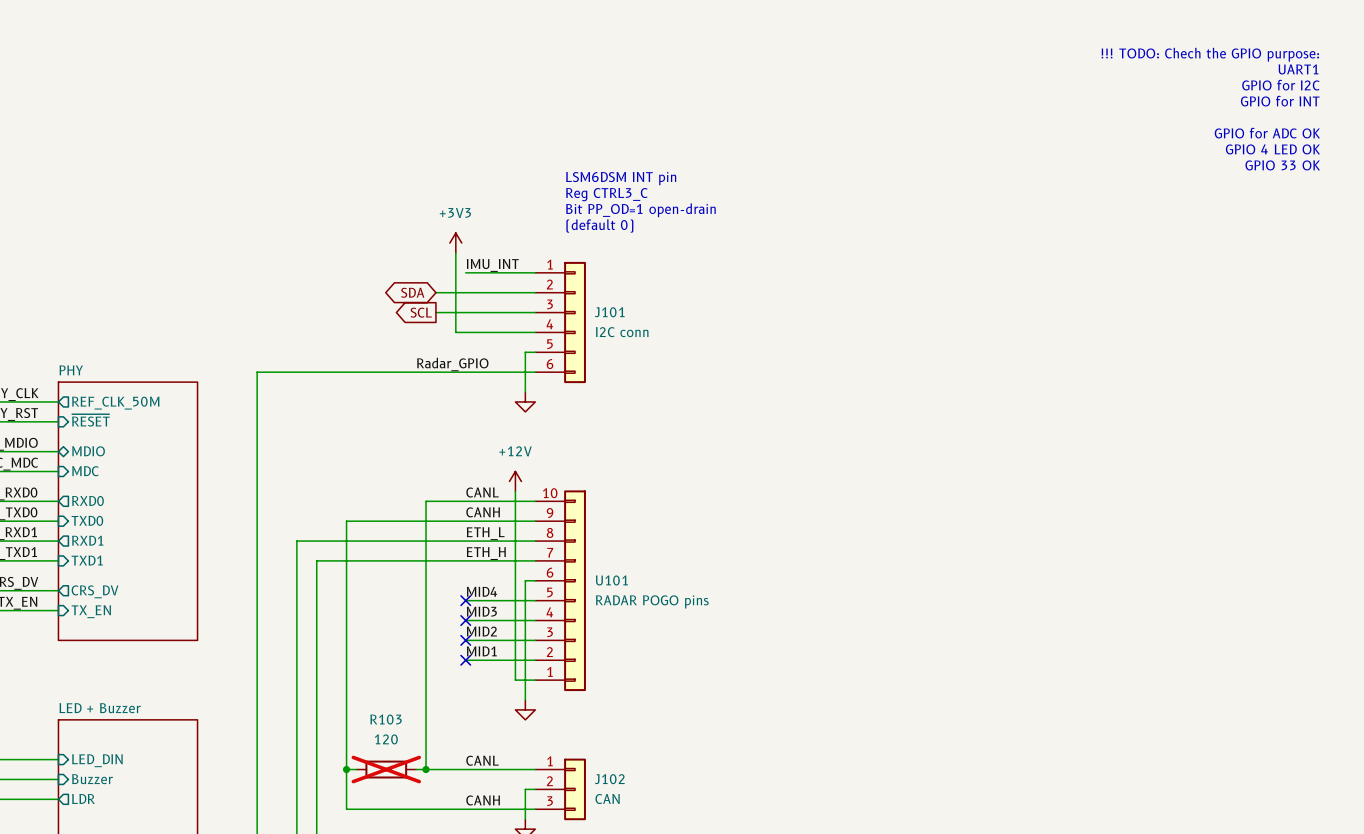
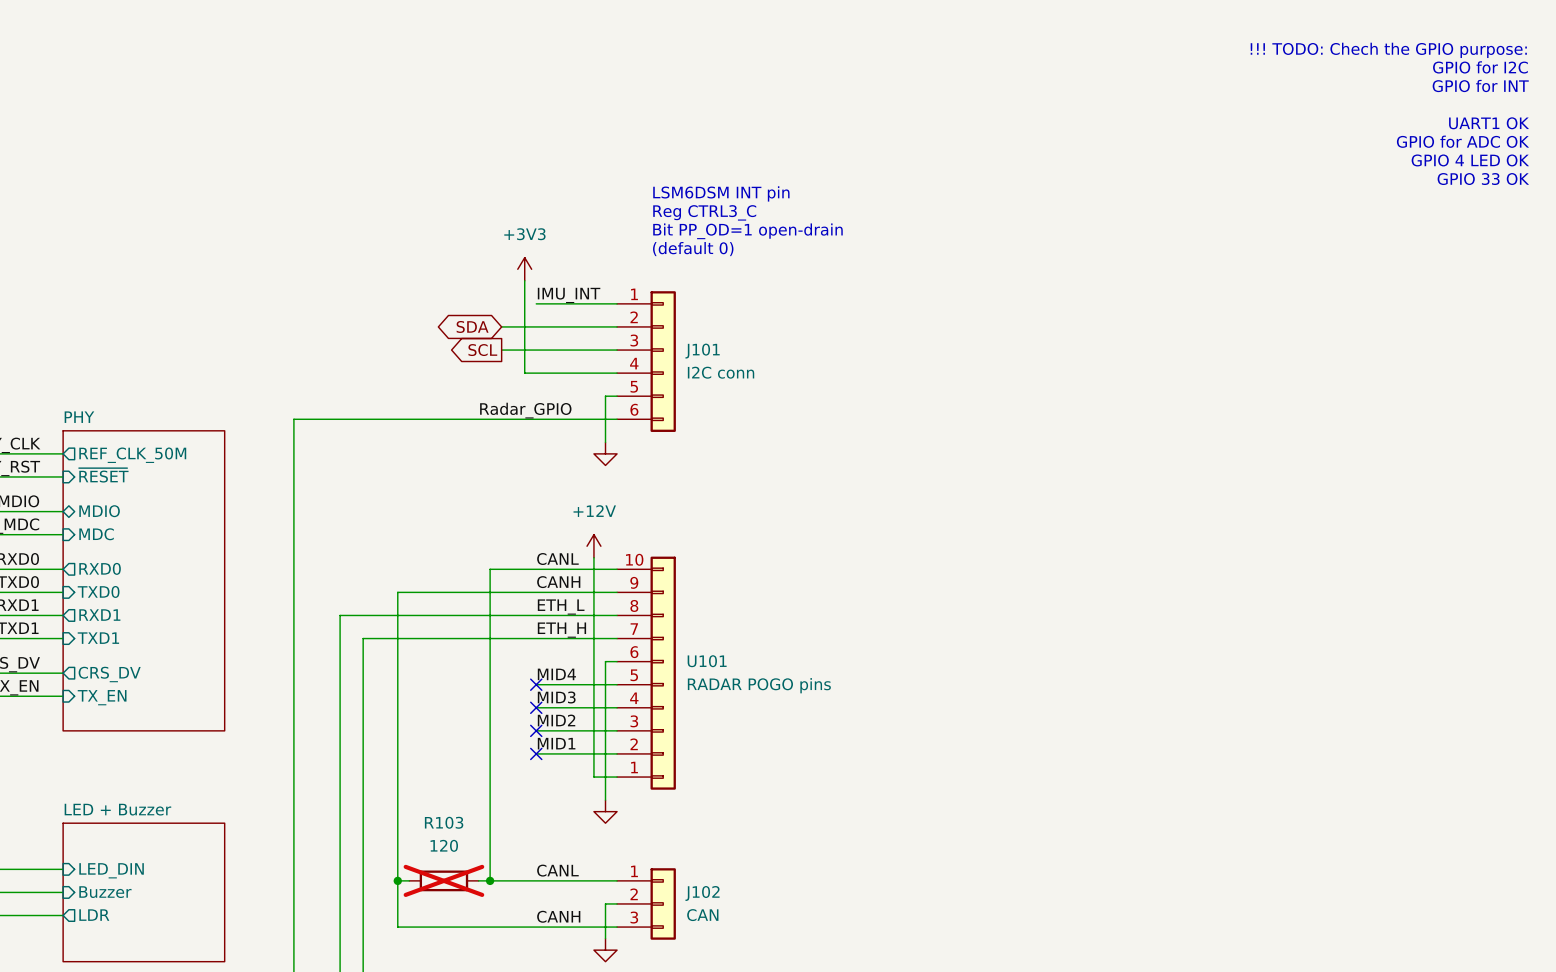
text: UART1 (1298, 69) -> GPIO for I2C (1480, 67)
text: GPIO for I2C (1280, 85) -> GPIO for INT (1480, 85)
text: GPIO for INT (1280, 101) -> none
text: none -> UART1 OK (1489, 123)

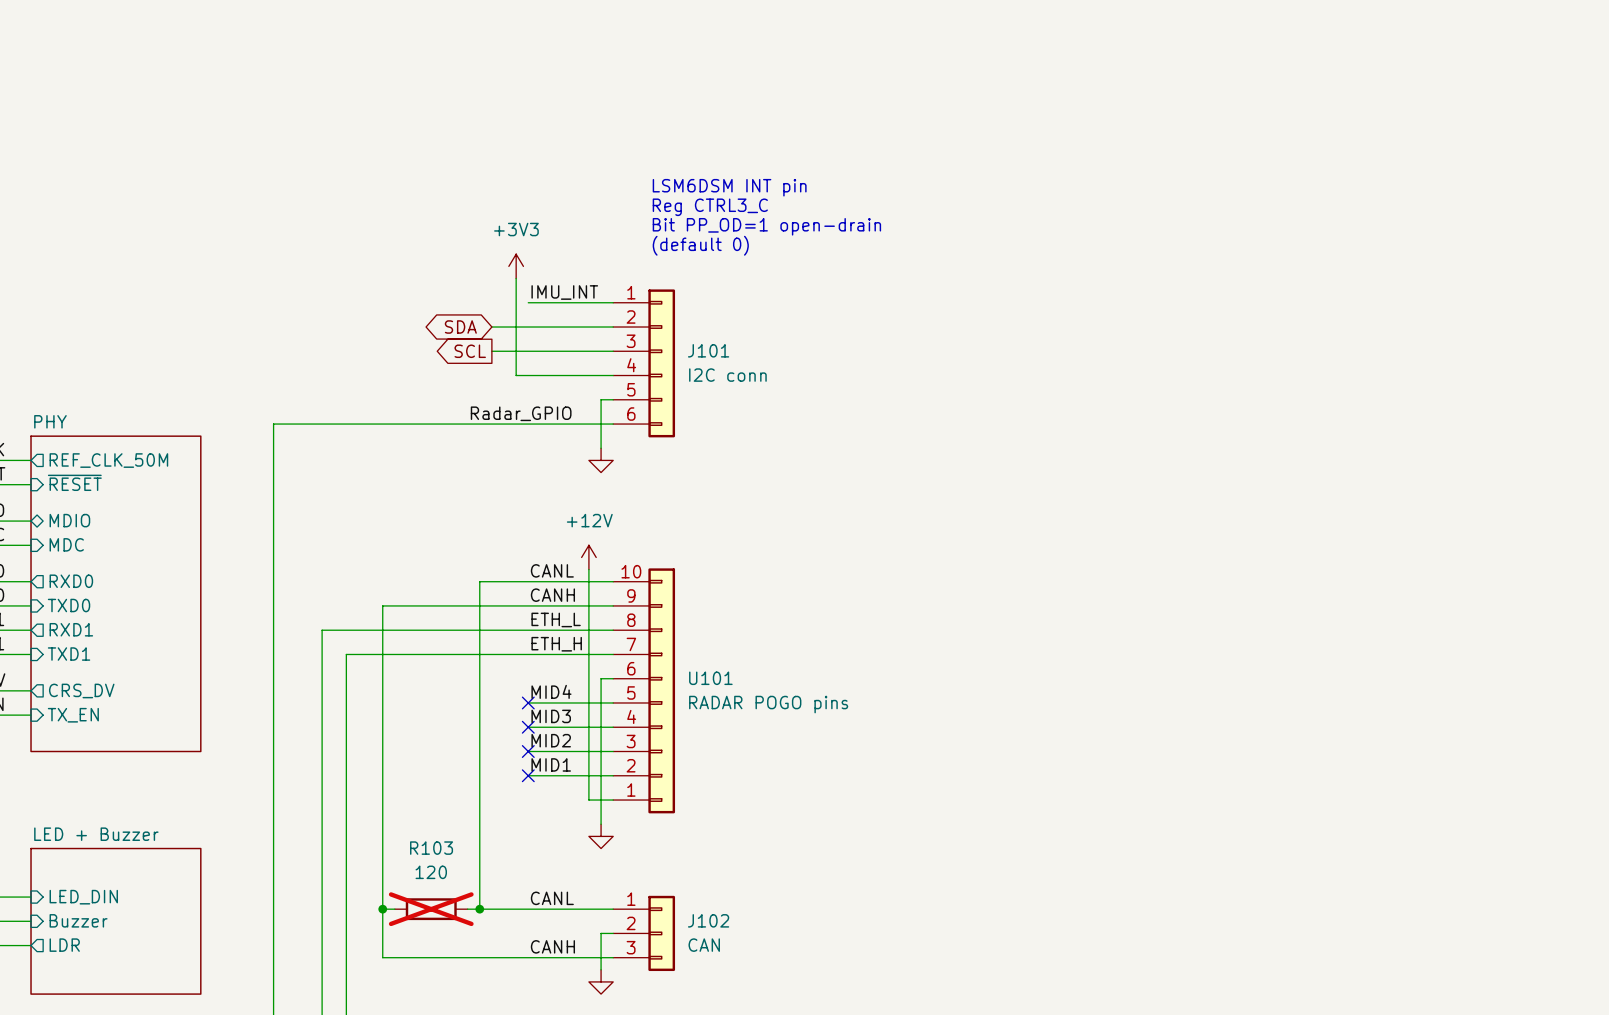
text: !!! TODO: Chech the GPIO purpose: (1388, 50) -> none
text: GPIO for I2C (1480, 67) -> none
text: GPIO for INT (1480, 85) -> none
text: UART1 OK (1489, 123) -> none
text: GPIO for ADC OK (1462, 141) -> none
text: GPIO 4 LED OK (1470, 160) -> none
text: GPIO 33 OK (1483, 179) -> none

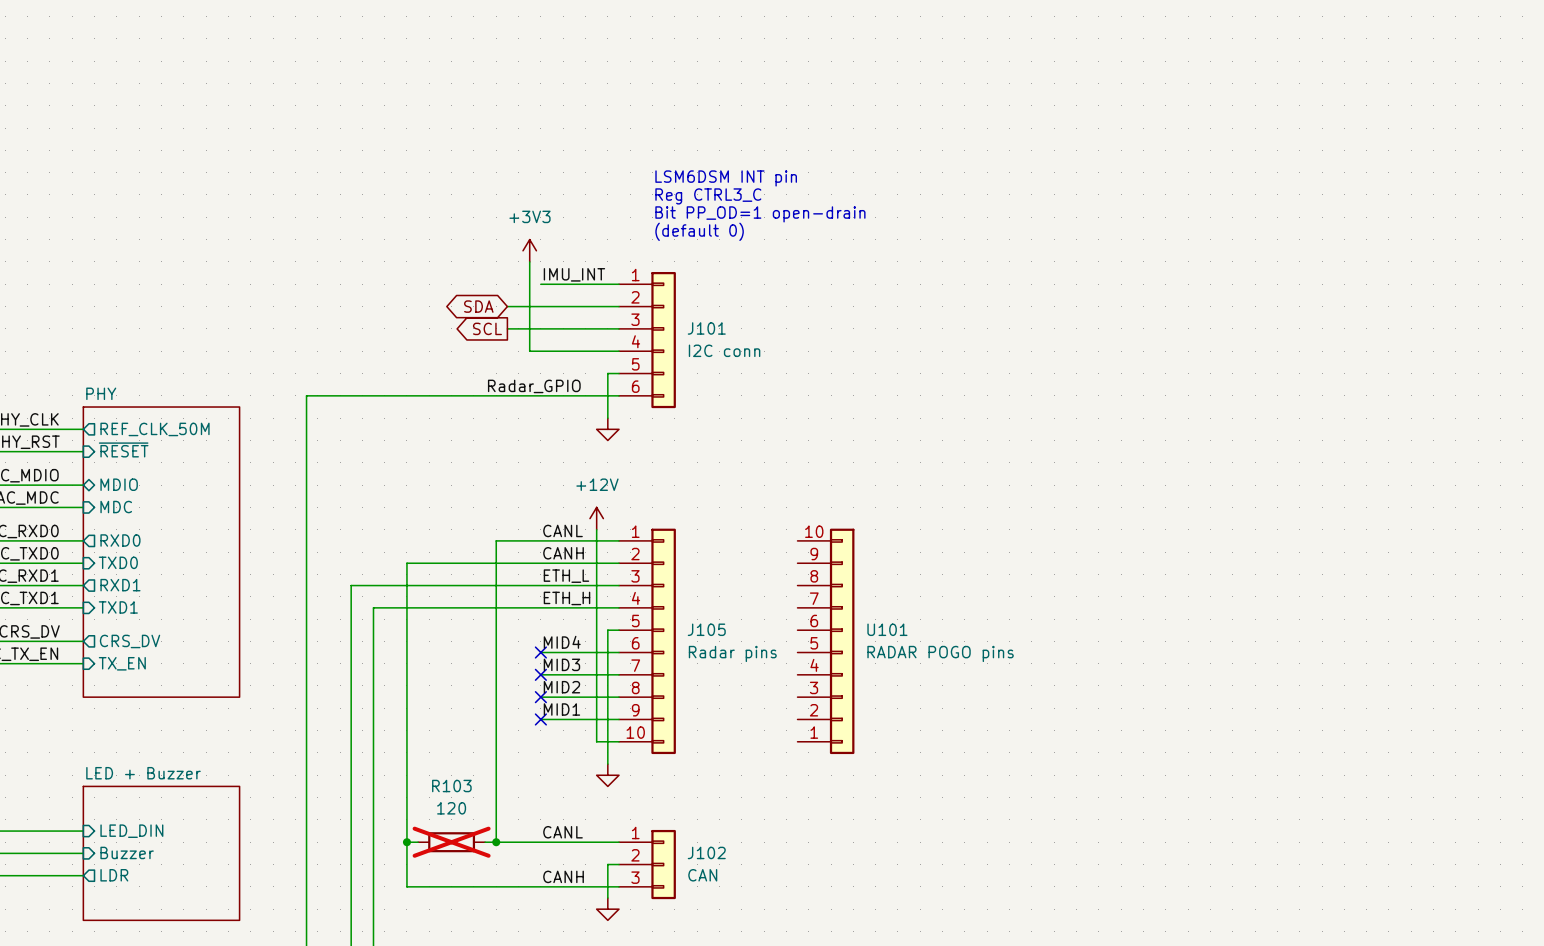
U101 position: (644, 690) -> (825, 641)
J105: none -> Radar pins (647, 641)

